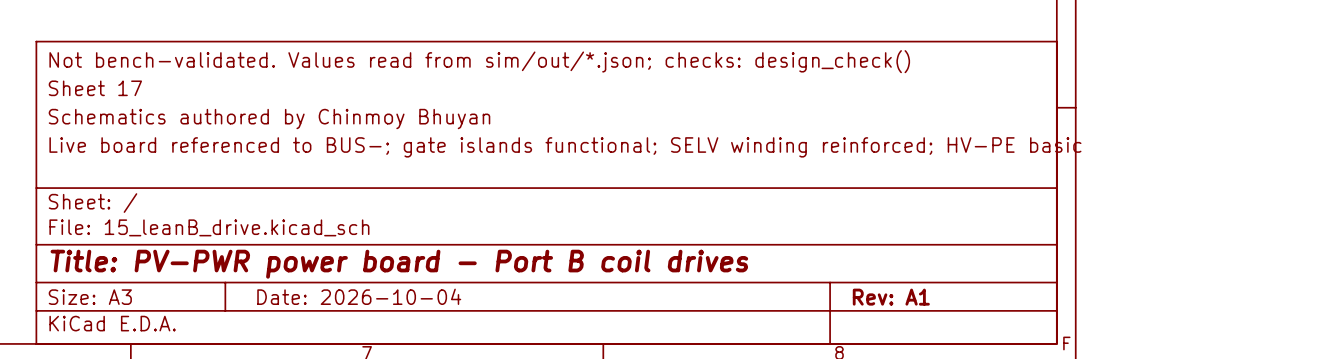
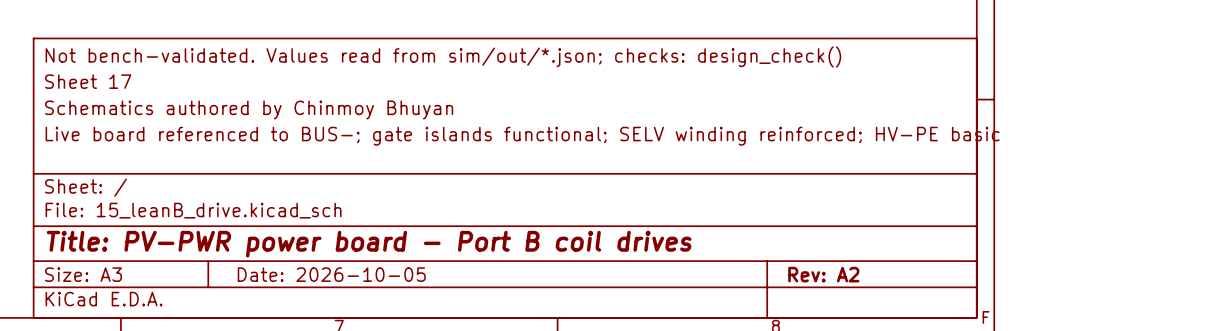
title block: Date: 2026-10-04 (359, 296) -> Date: 2026-10-05 (331, 274)
title block: Rev: A1 (891, 297) -> Rev: A2 (823, 274)

